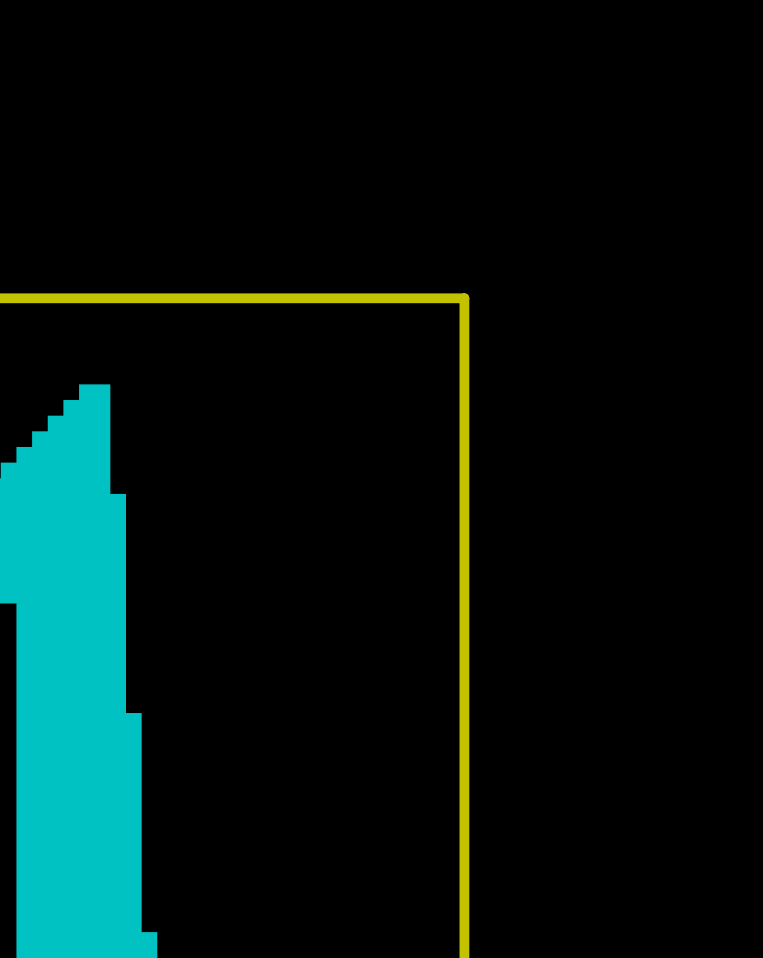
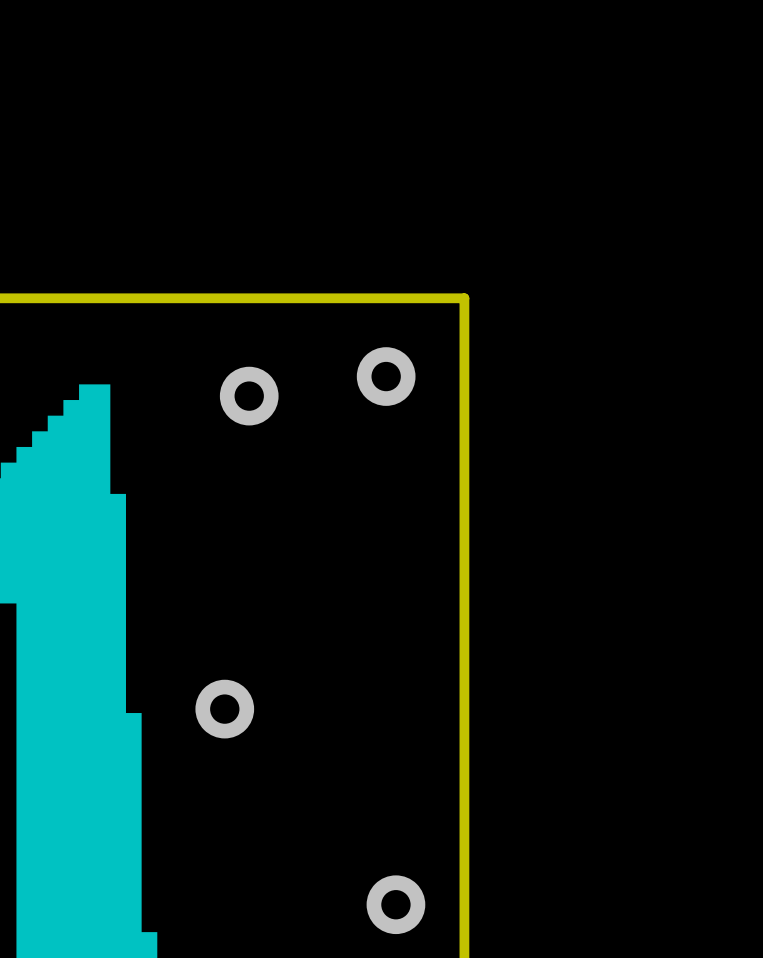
via: none -> (386, 376)
via: none -> (249, 396)
via: none -> (224, 709)
via: none -> (395, 904)

